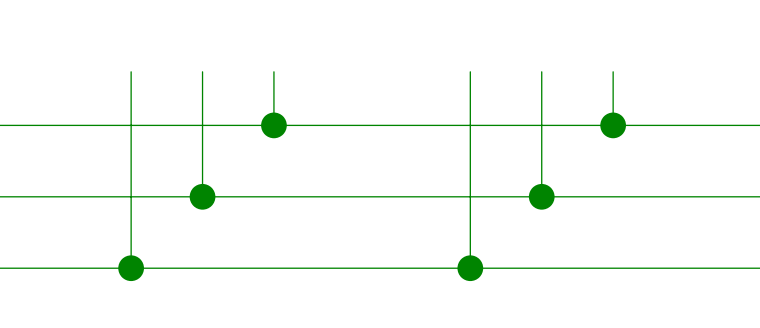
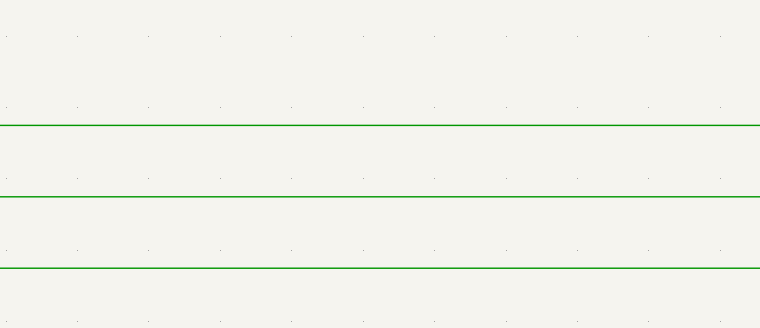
wire: (131, 71) (131, 268) -> none
wire: (202, 71) (202, 196) -> none
wire: (273, 71) (273, 125) -> none
wire: (470, 71) (470, 268) -> none
wire: (541, 71) (541, 196) -> none
wire: (613, 71) (613, 125) -> none
junction: (273, 125) -> none
junction: (613, 125) -> none
junction: (202, 196) -> none
junction: (541, 196) -> none
junction: (131, 268) -> none
junction: (470, 268) -> none

